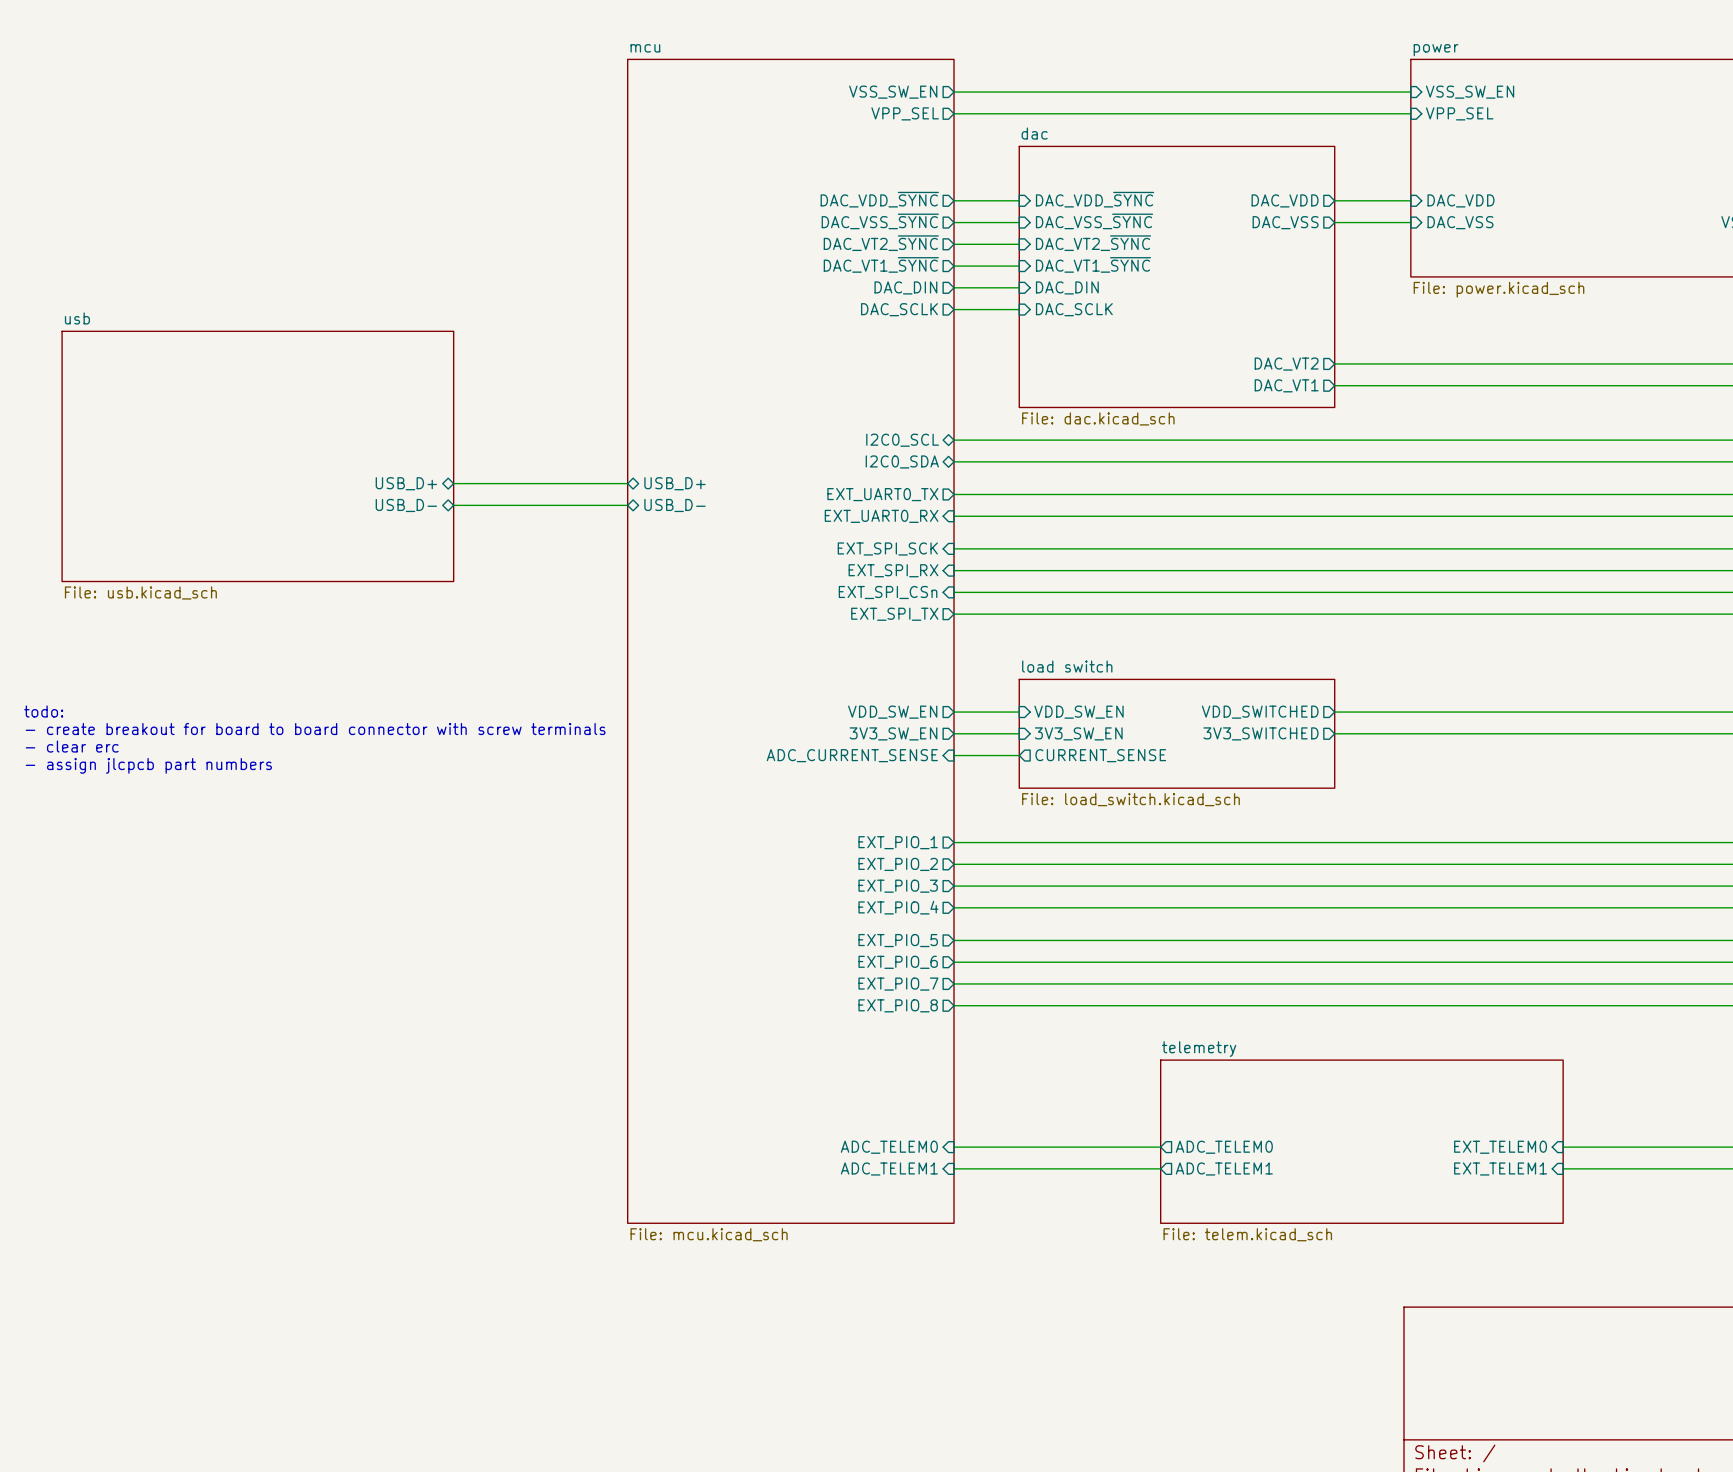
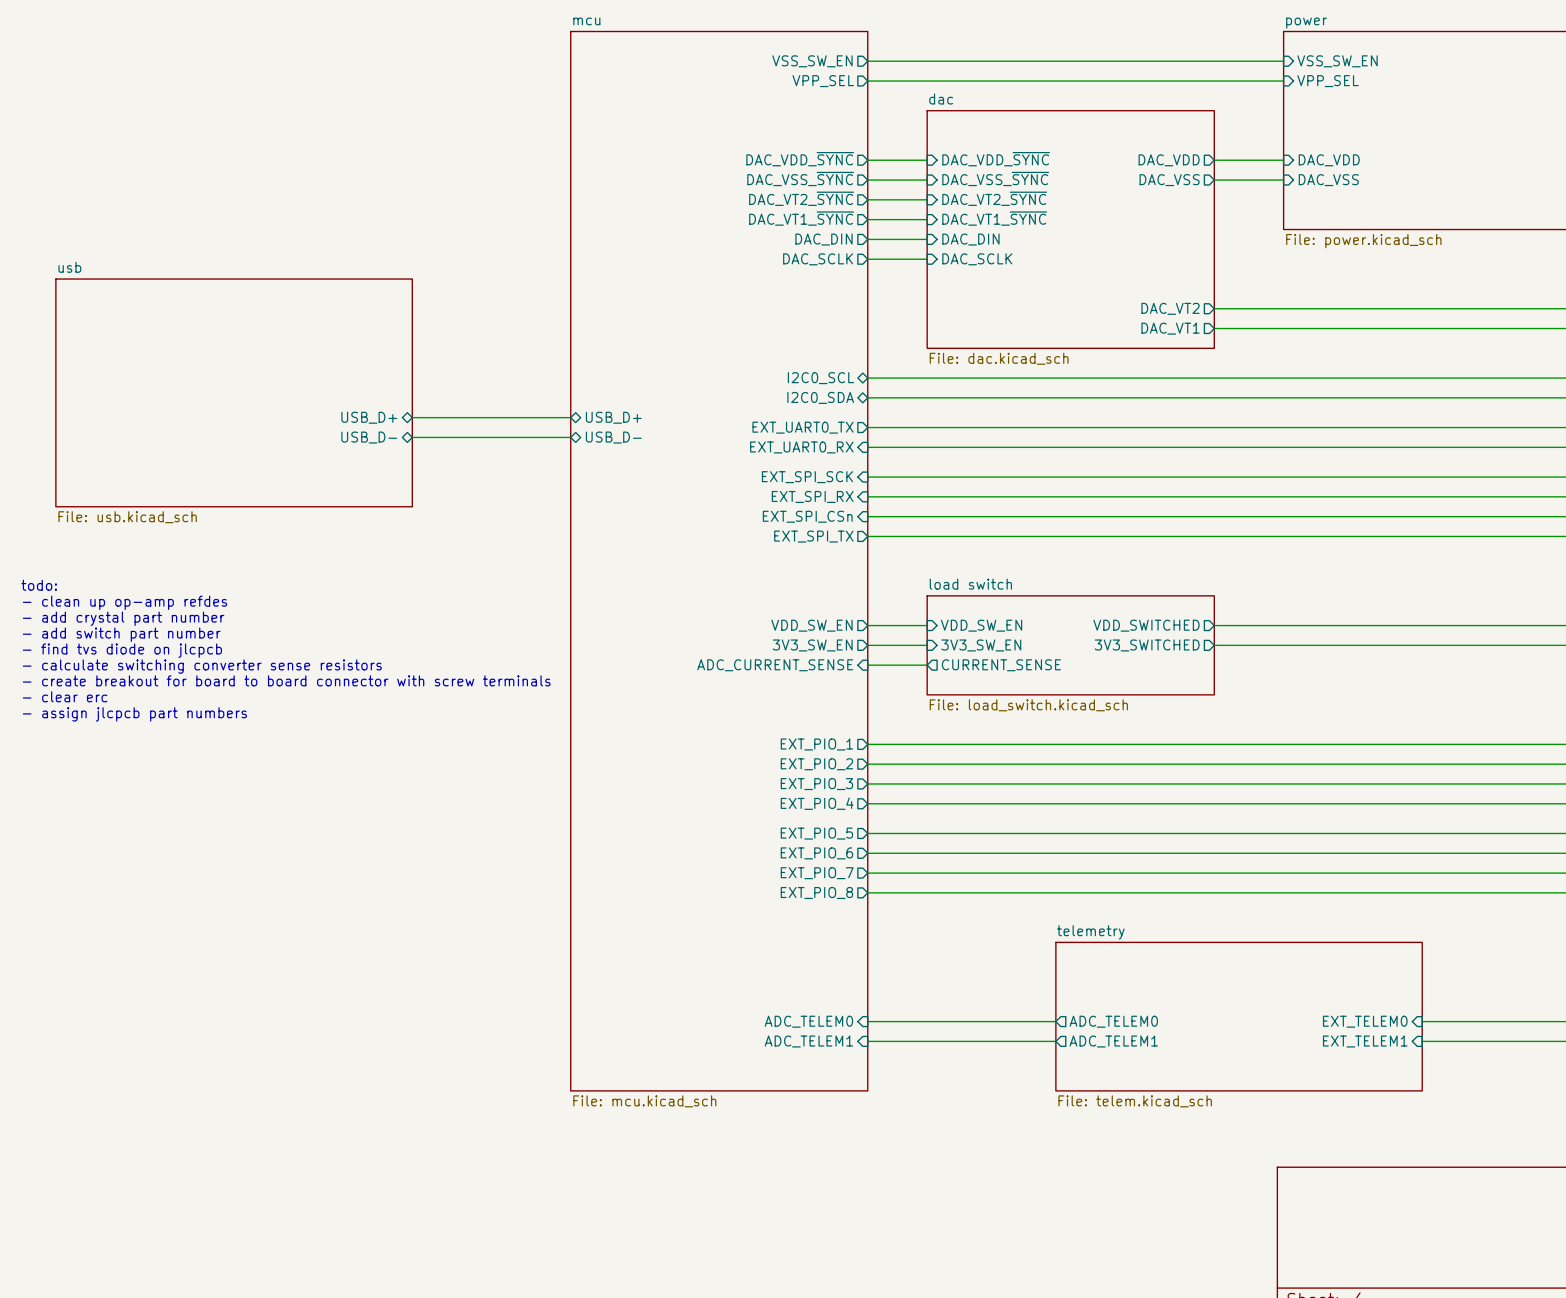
text: none -> - clean up op-amp refdes (124, 602)
text: none -> - add crystal part number (123, 618)
text position: todo: (43, 711) -> todo: (39, 585)
text: none -> - add switch part number (121, 634)
text position: - create breakout for board to board connector with screw terminals (315, 729) -> - create breakout for board to board connector with screw terminals (286, 680)
text: none -> - find tvs diode on jlcpcb (122, 650)
text position: - clear erc (72, 746) -> - clear erc (65, 696)
text: none -> - calculate switching converter sense resistors (202, 666)
text position: - assign jlcpcb part numbers (148, 765) -> - assign jlcpcb part numbers (134, 714)

